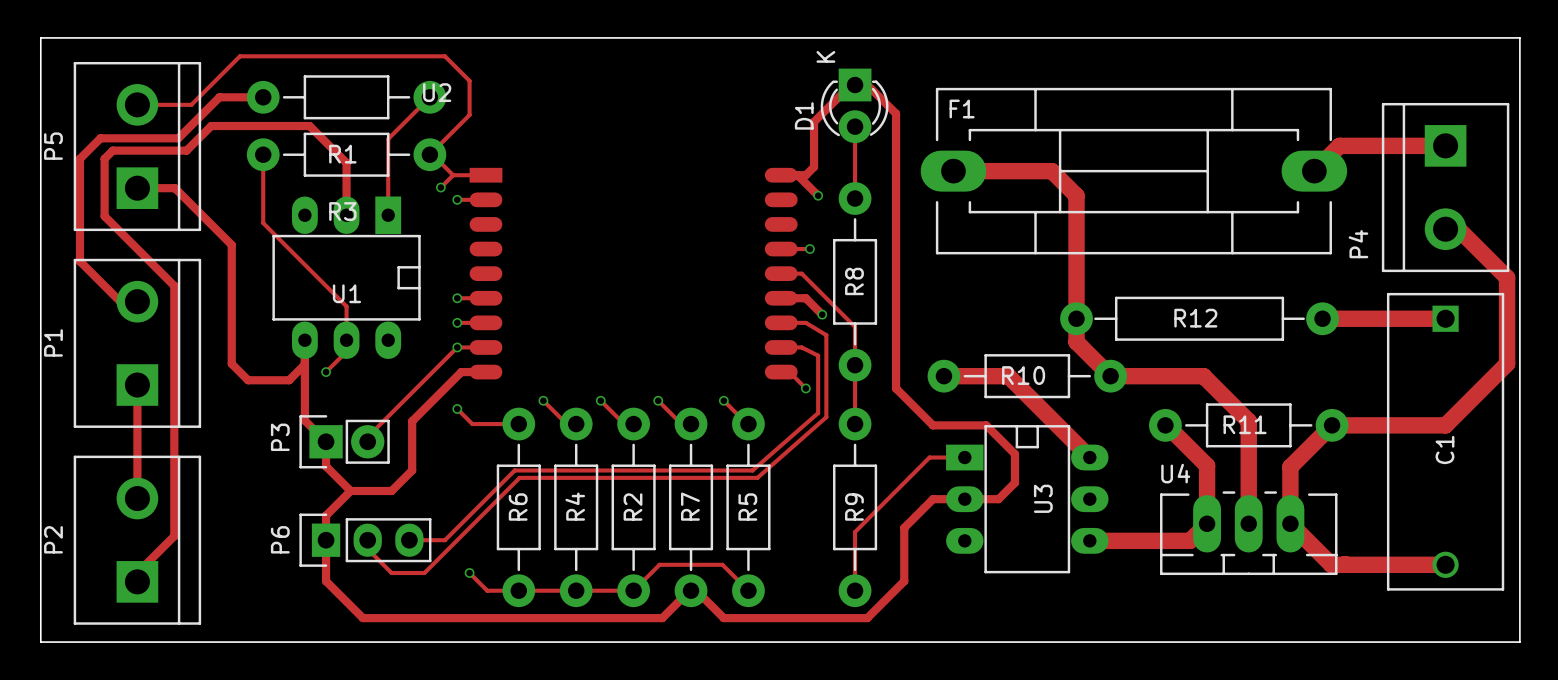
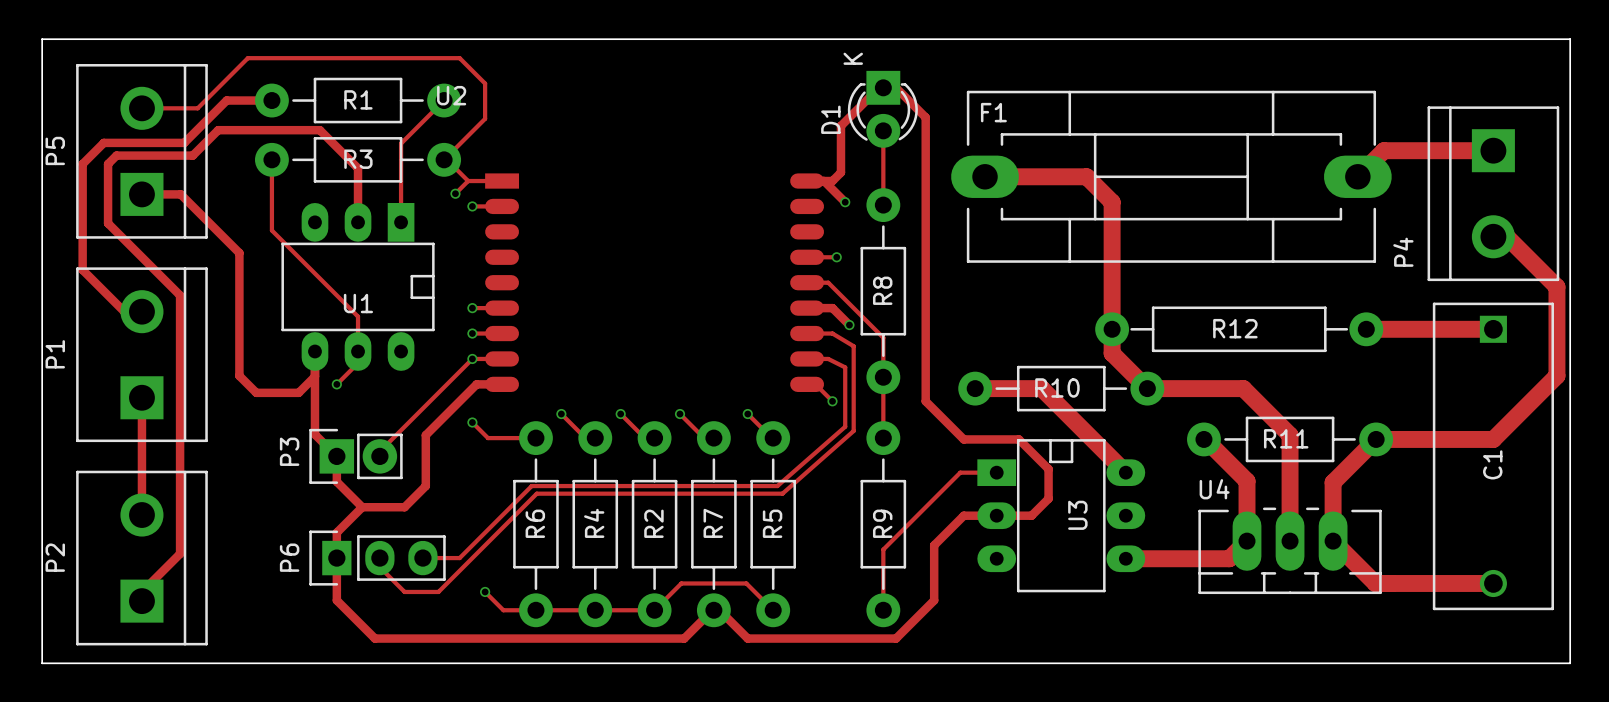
R1 name position: R1 (342, 154) -> R1 (358, 99)
R3 name position: R3 (342, 211) -> R3 (358, 159)

